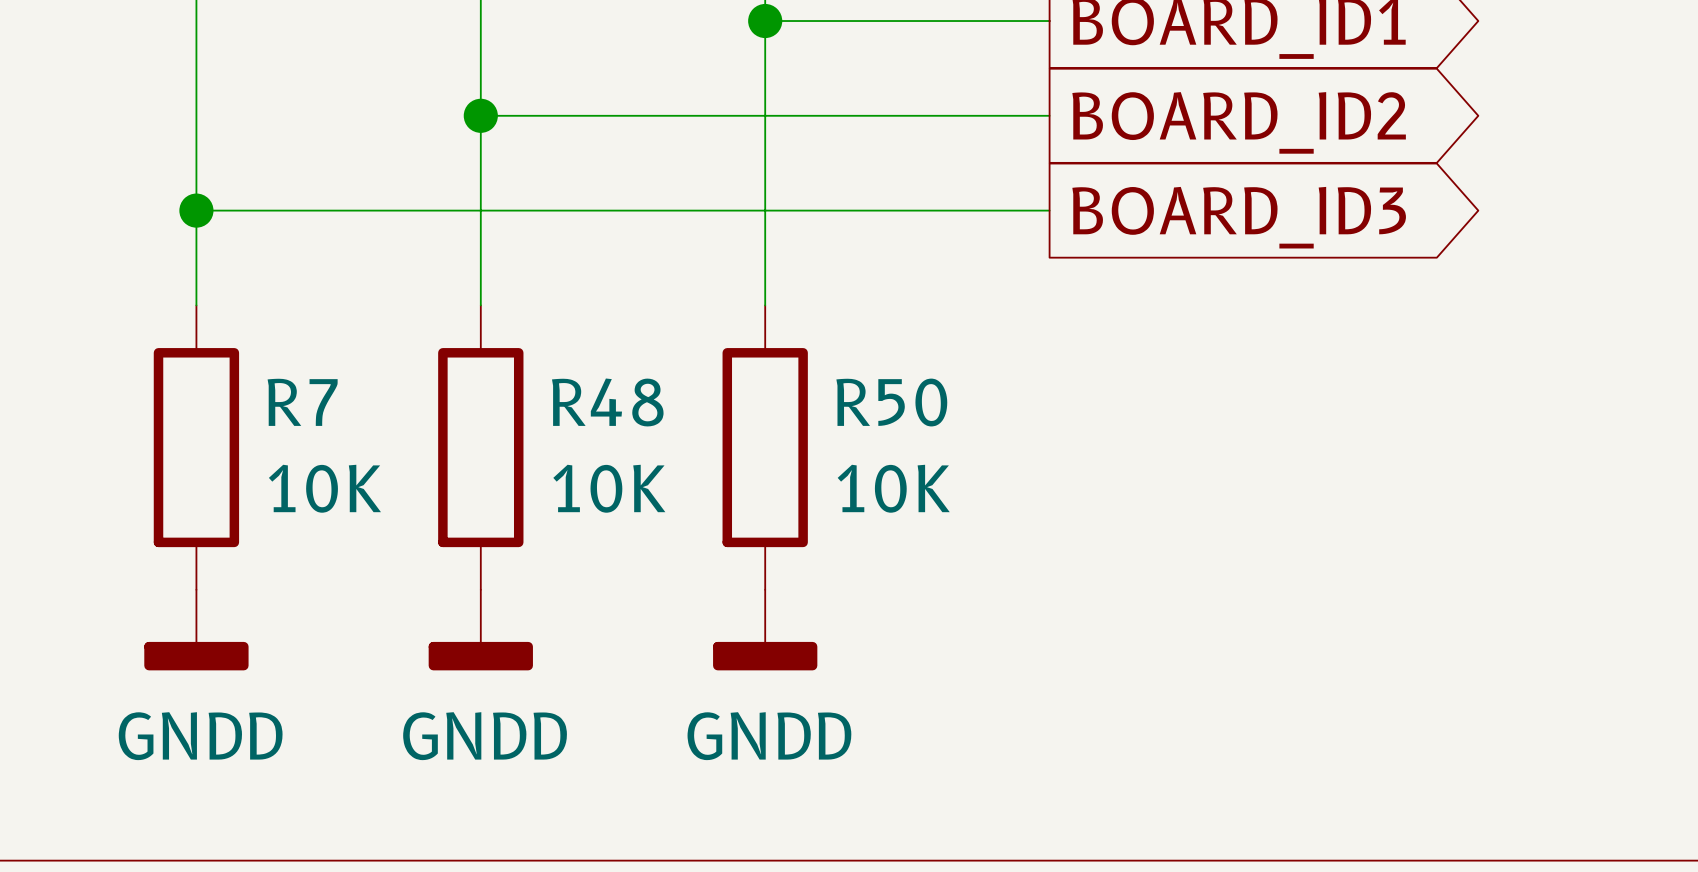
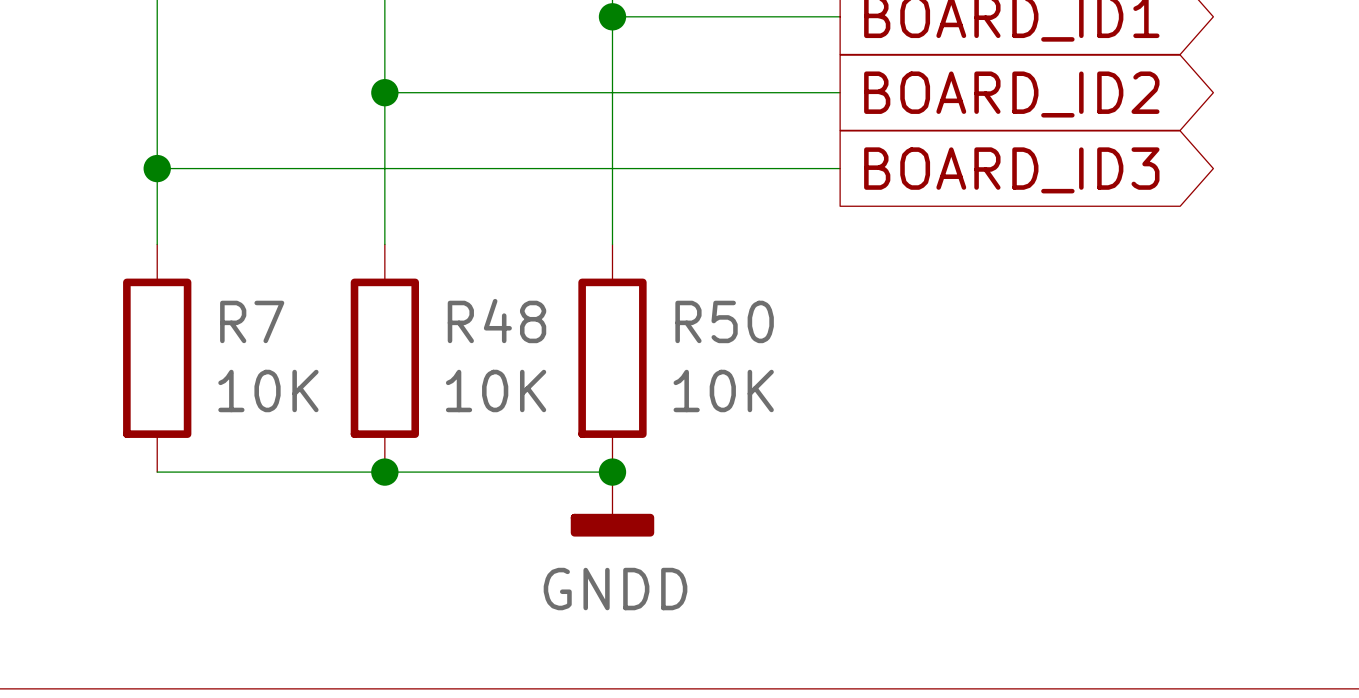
wire: none -> (157, 472) (612, 472)
junction: none -> (384, 472)
junction: none -> (612, 472)
power symbol: GNDD (196, 630) -> none
power symbol: GNDD (480, 630) -> none

